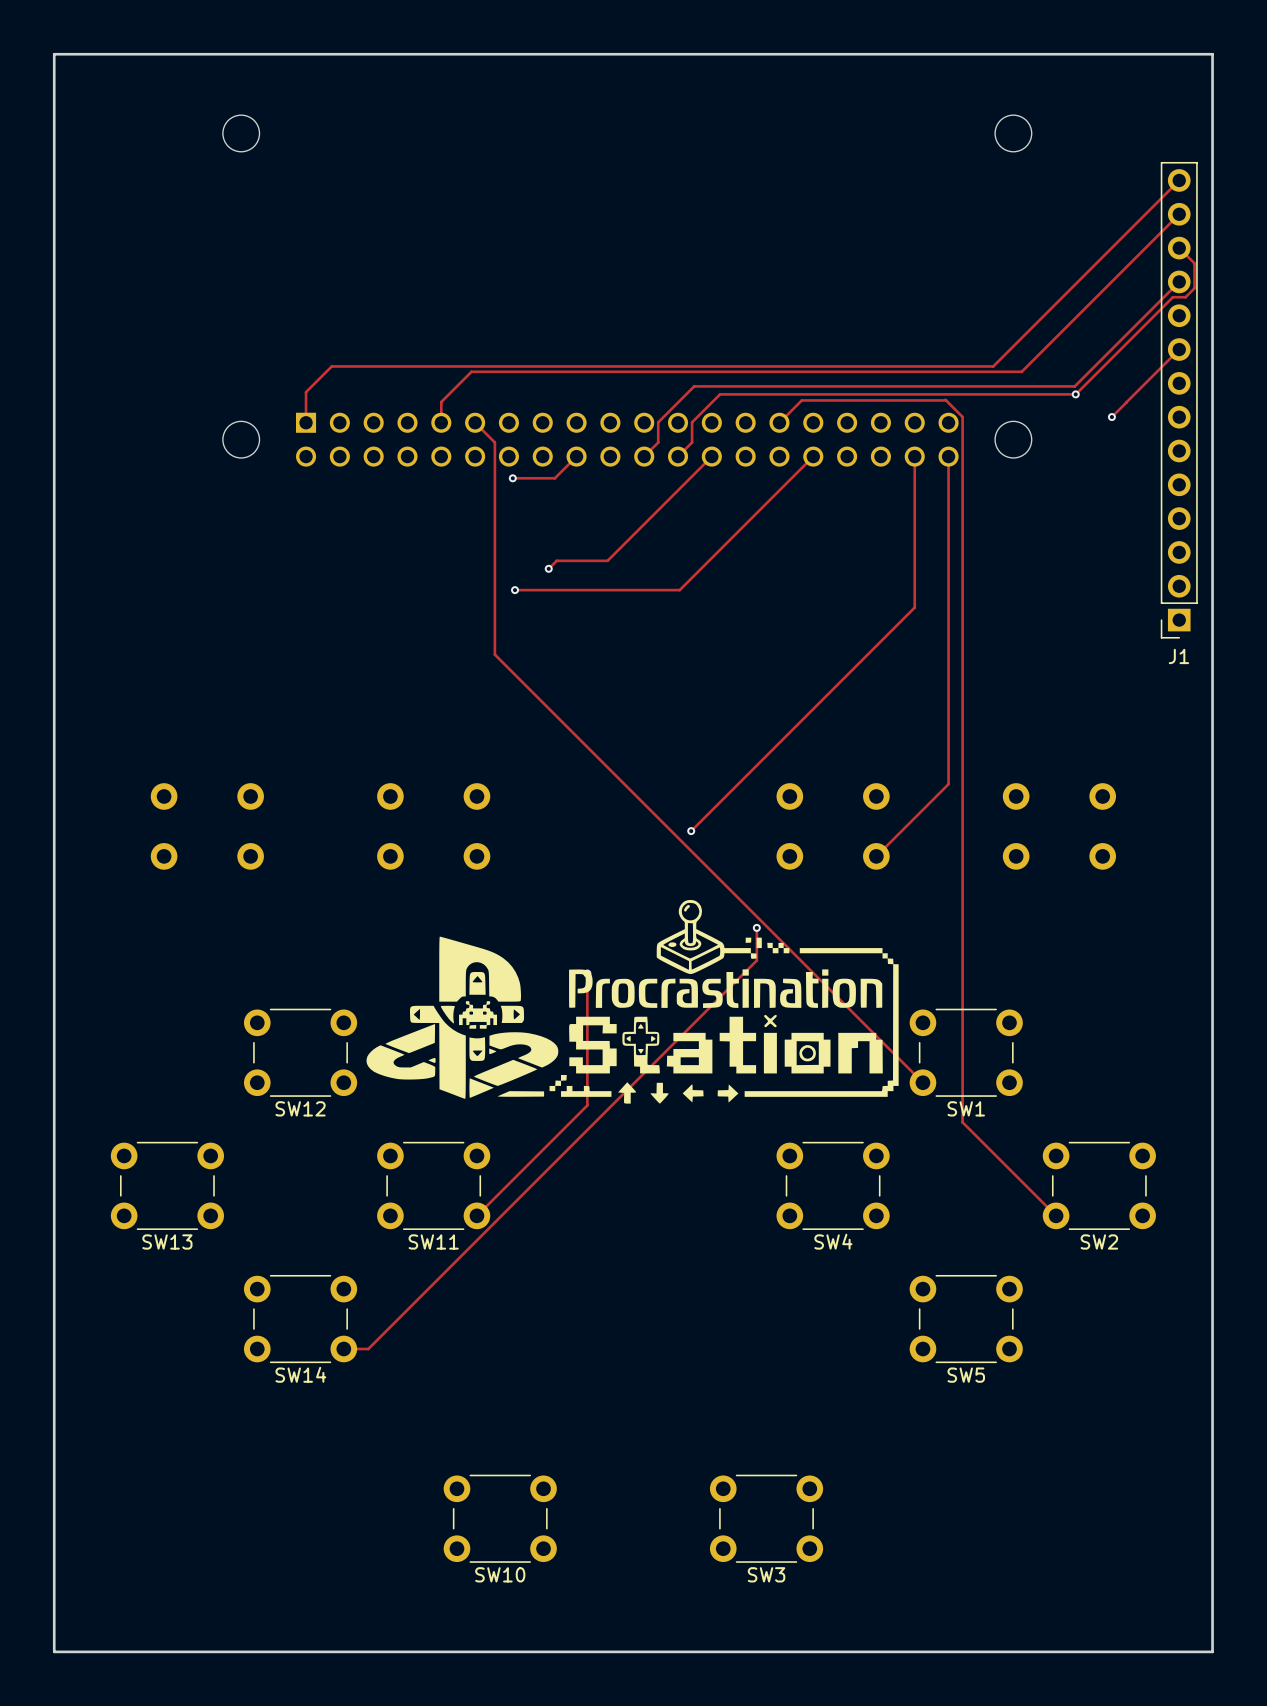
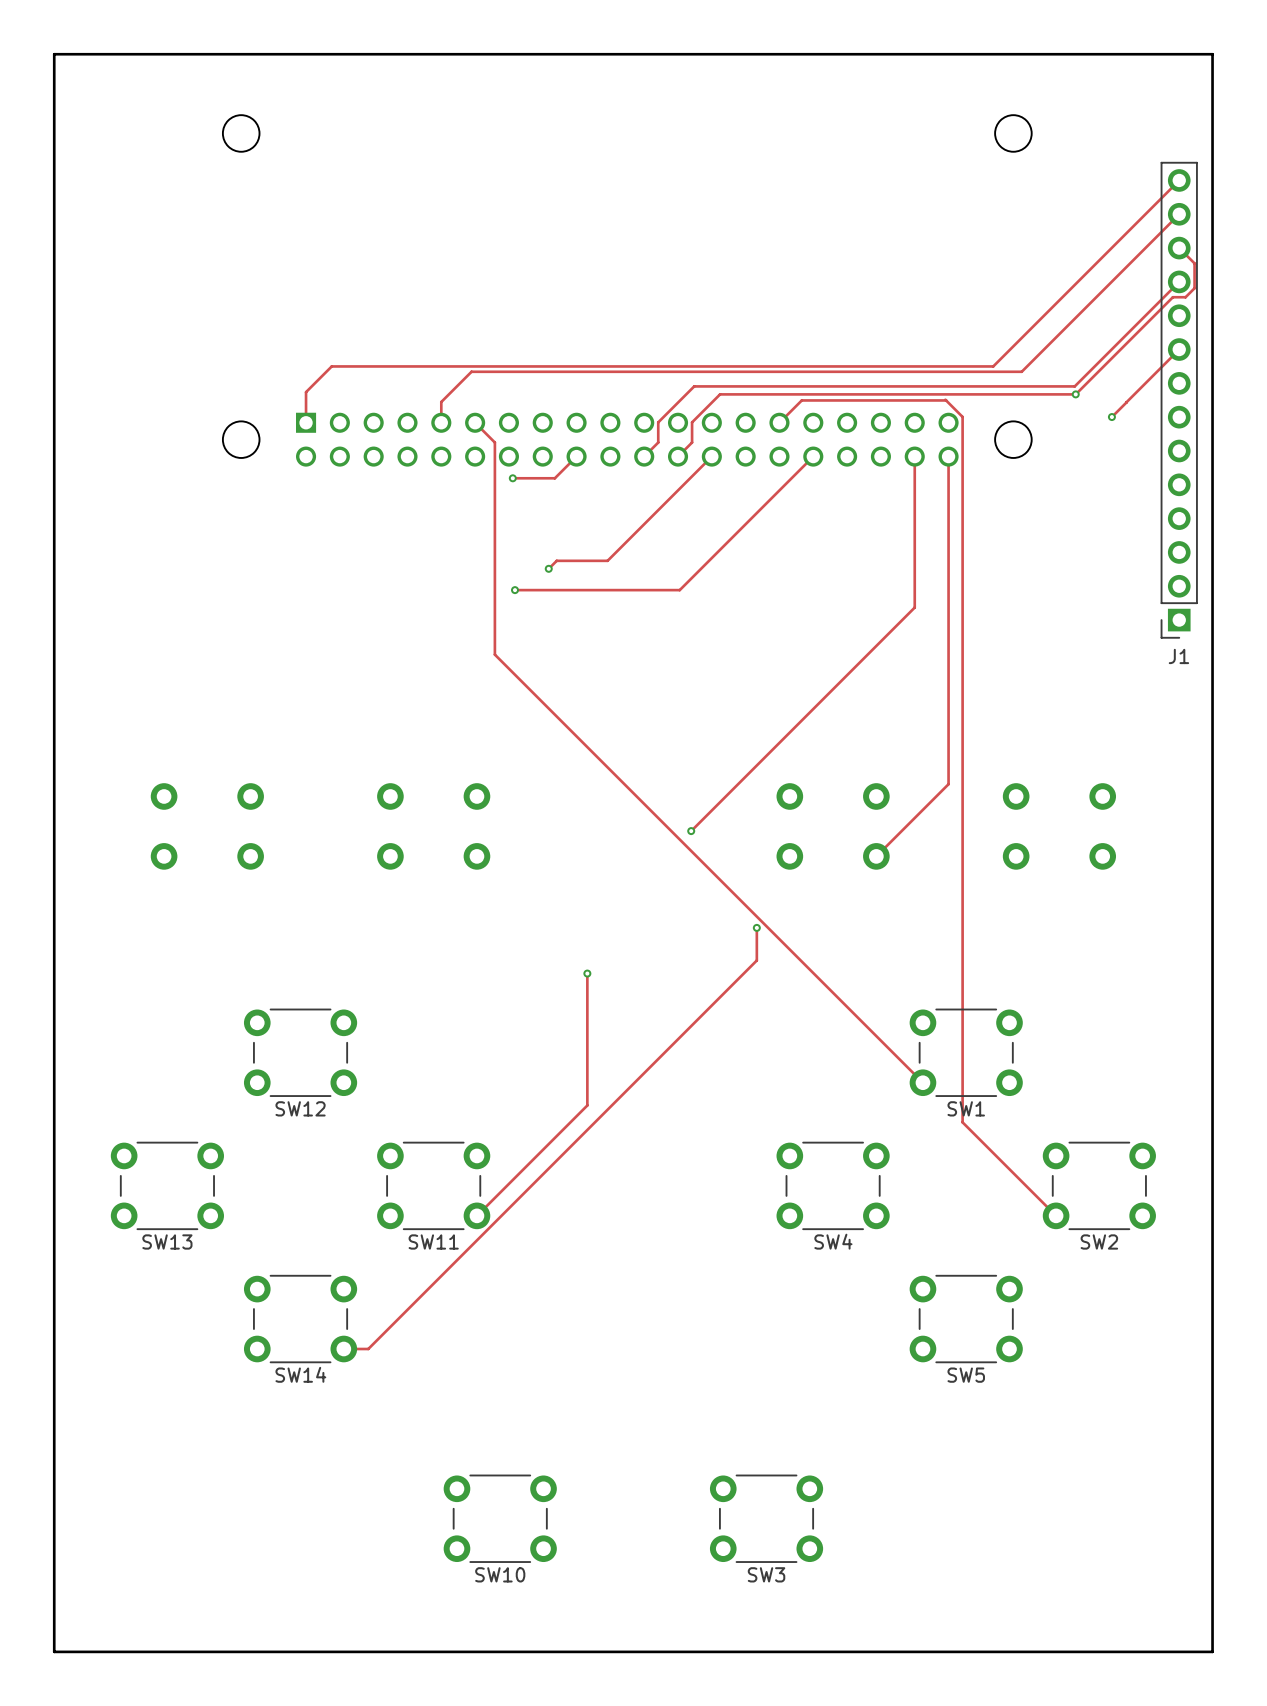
drawing: [366, 899, 899, 1104] -> none

